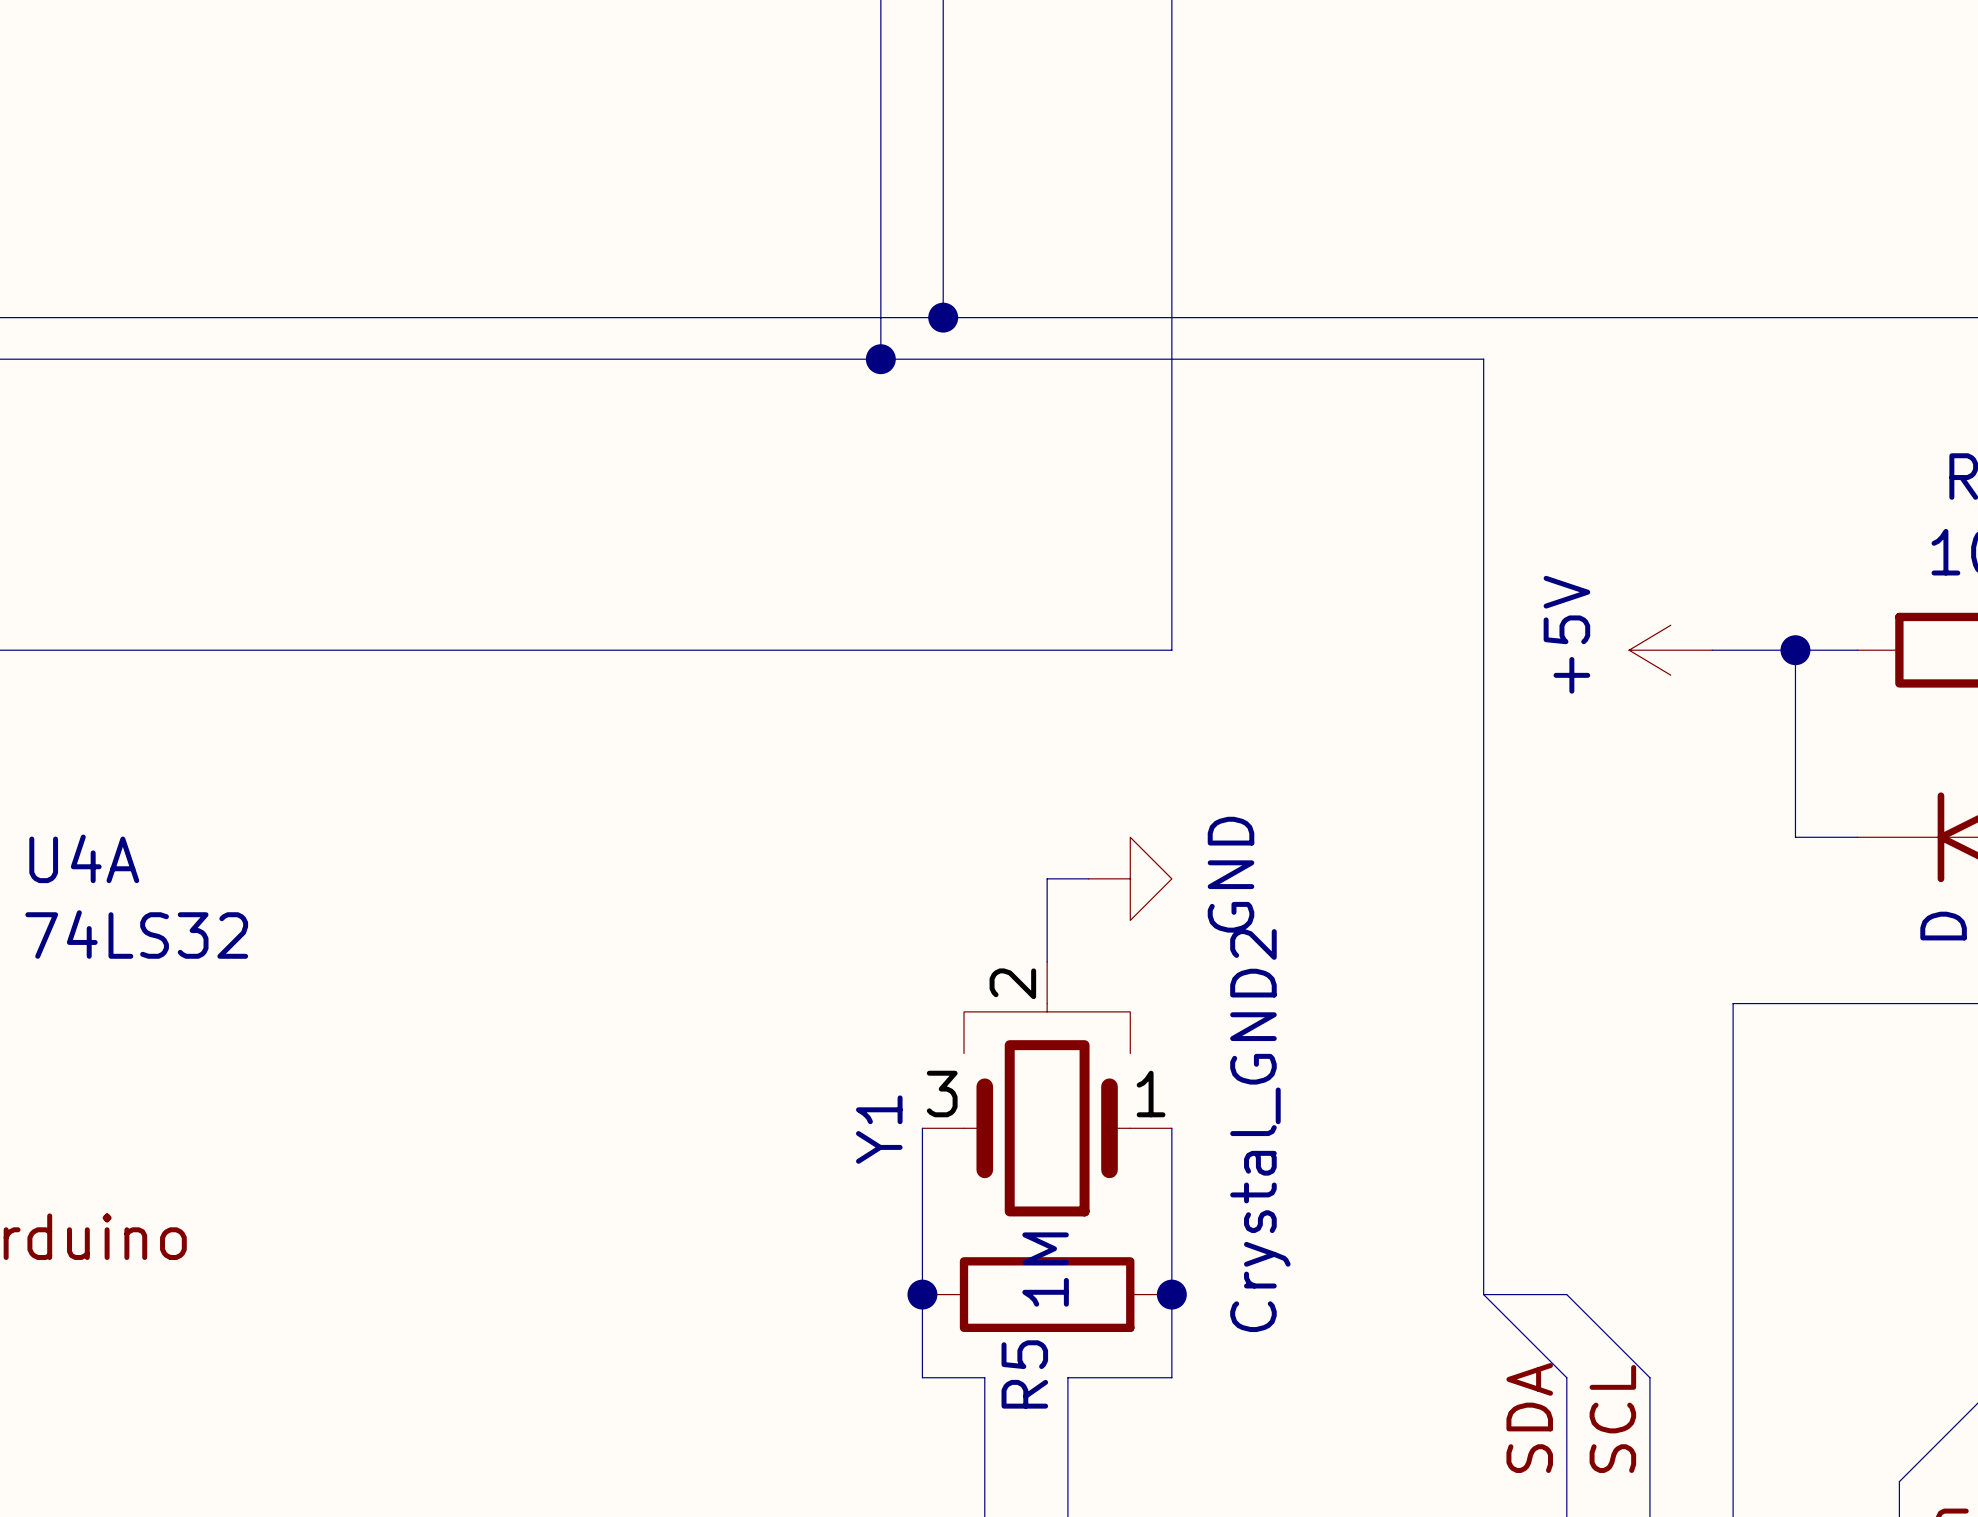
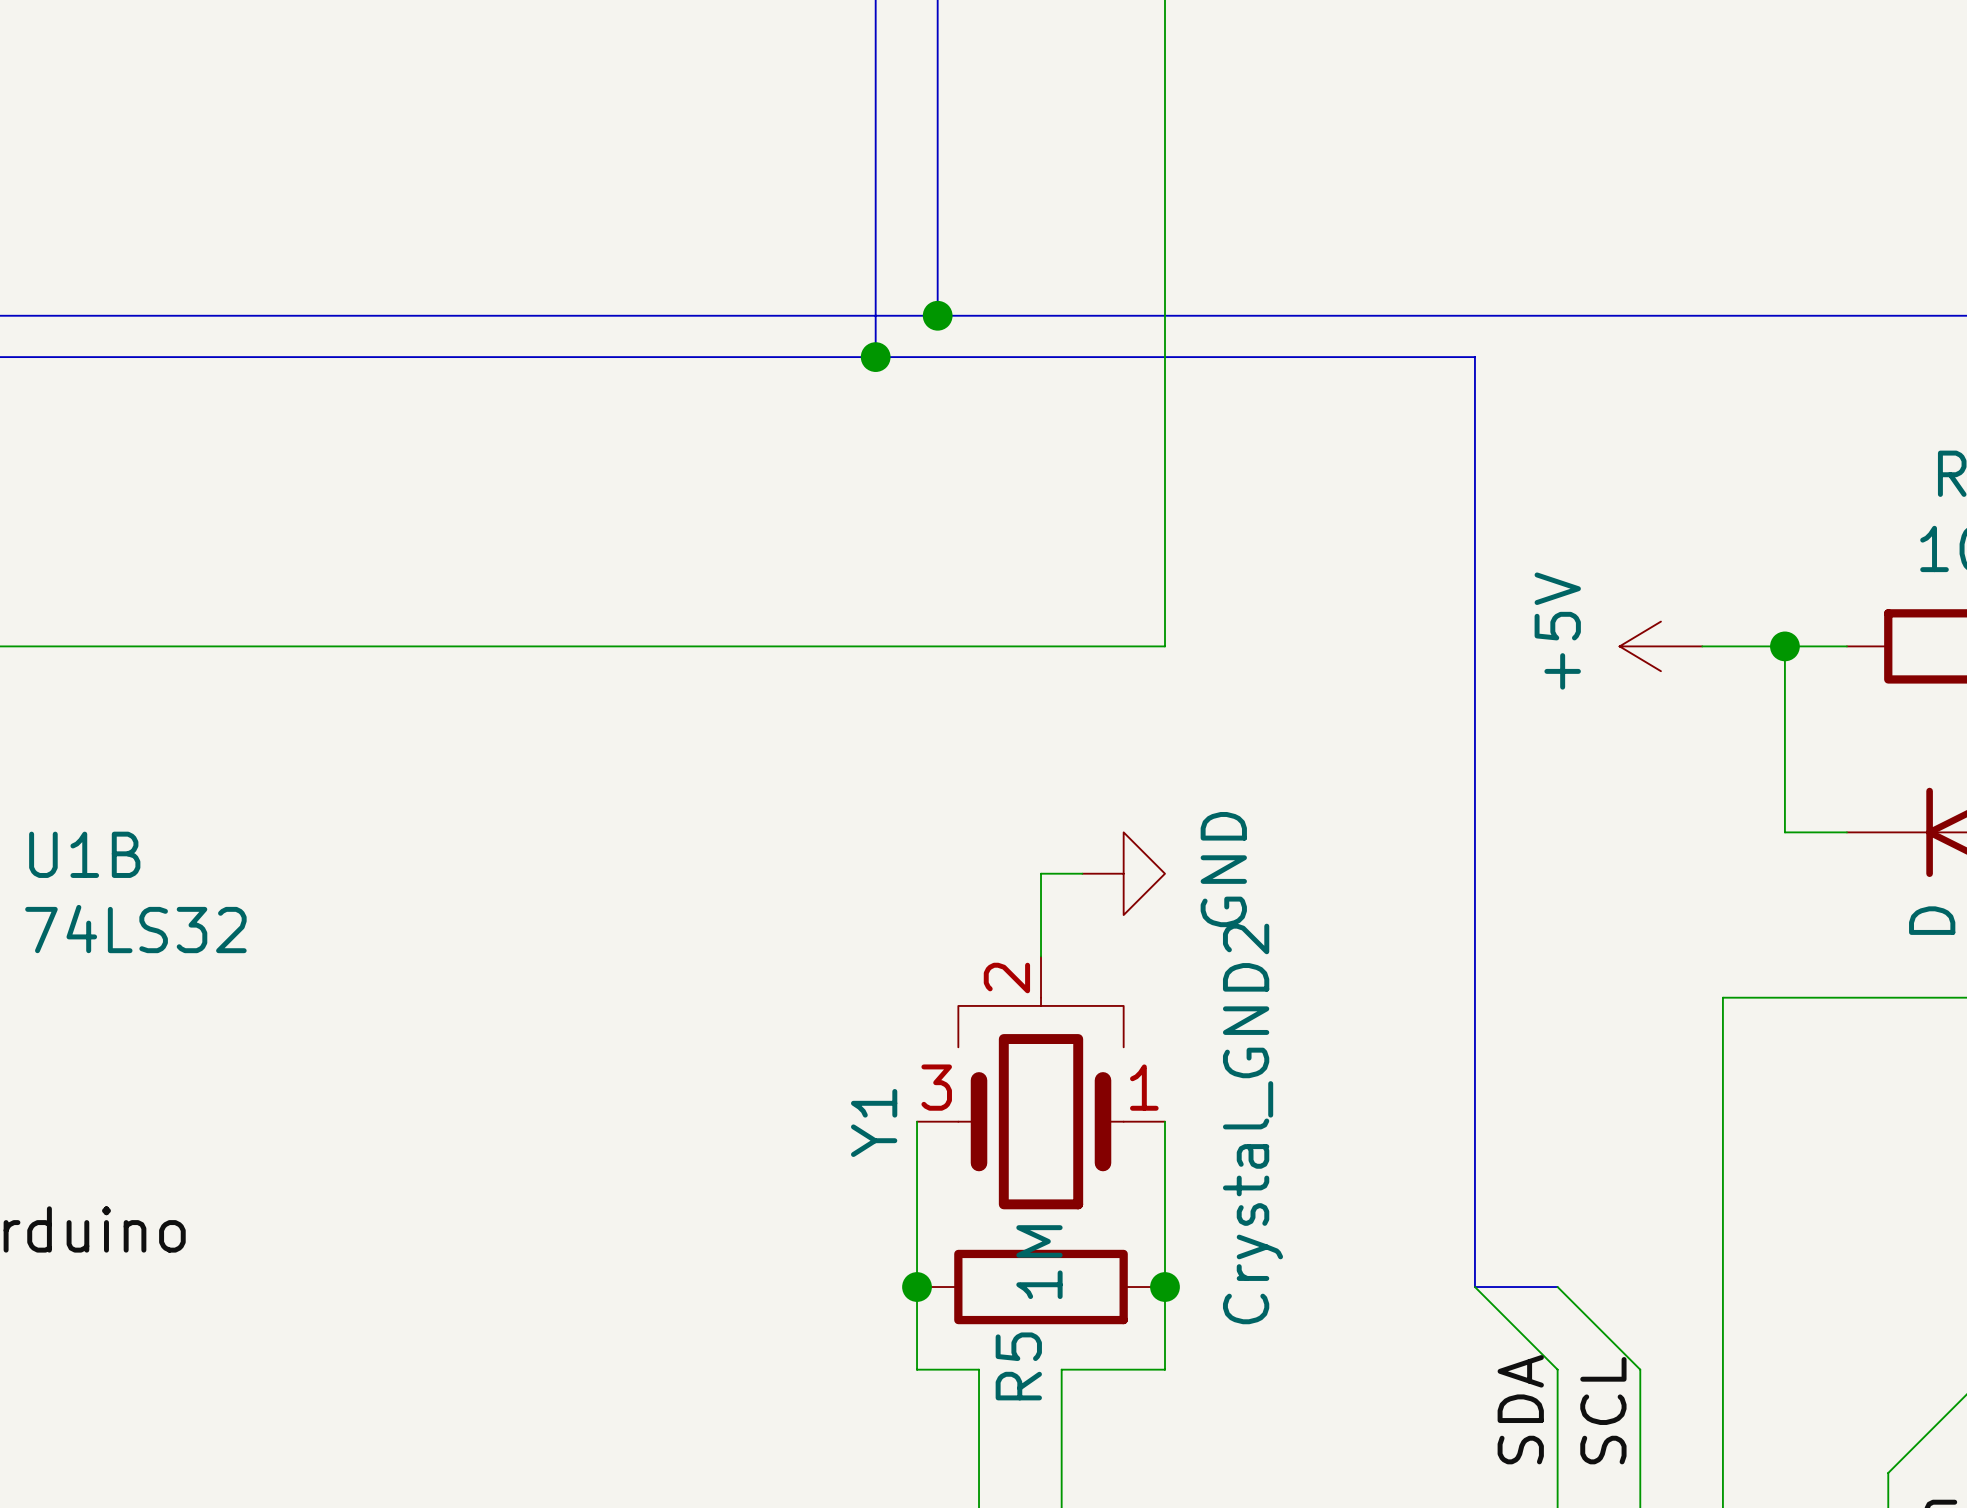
U4A name: U4A (84, 858) -> U1B (84, 854)

